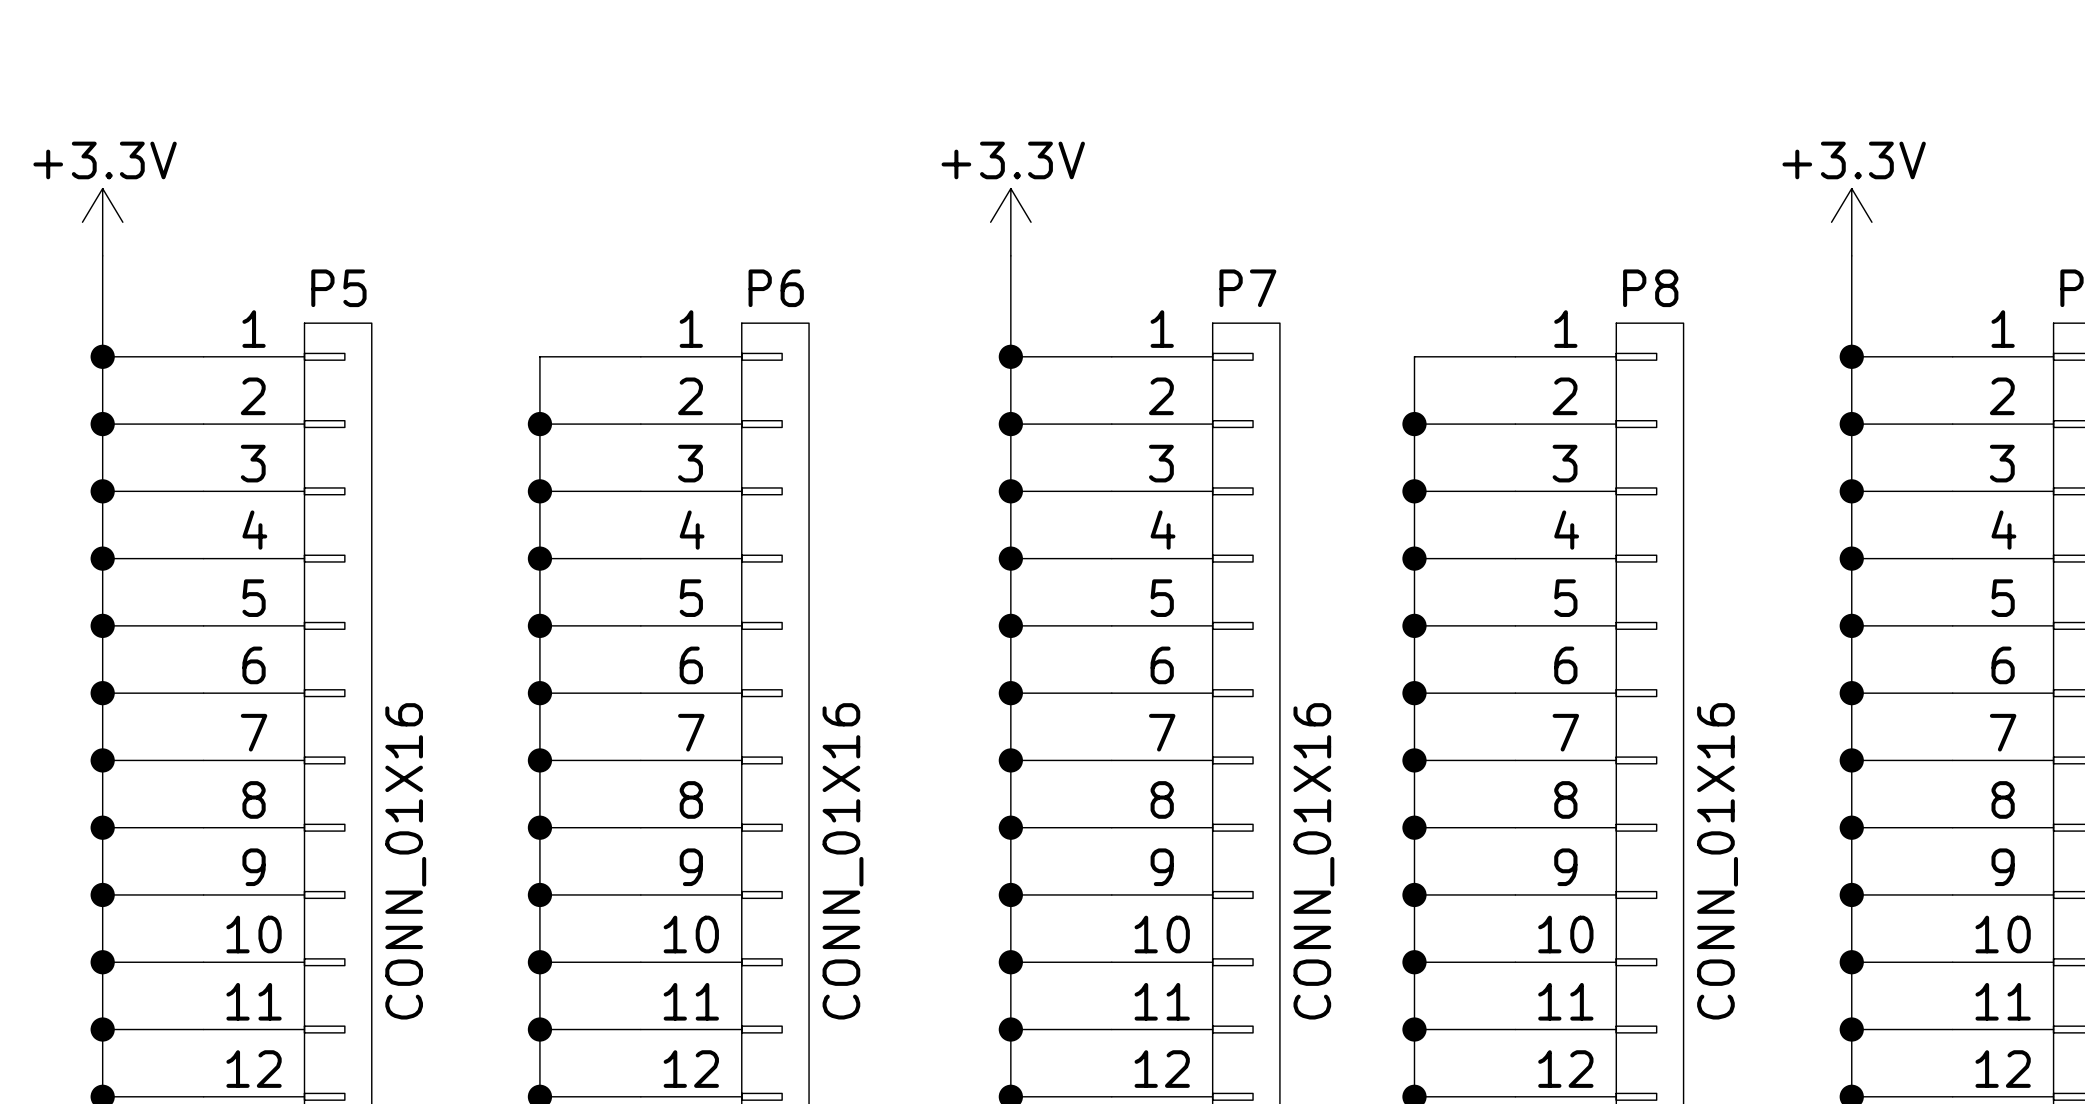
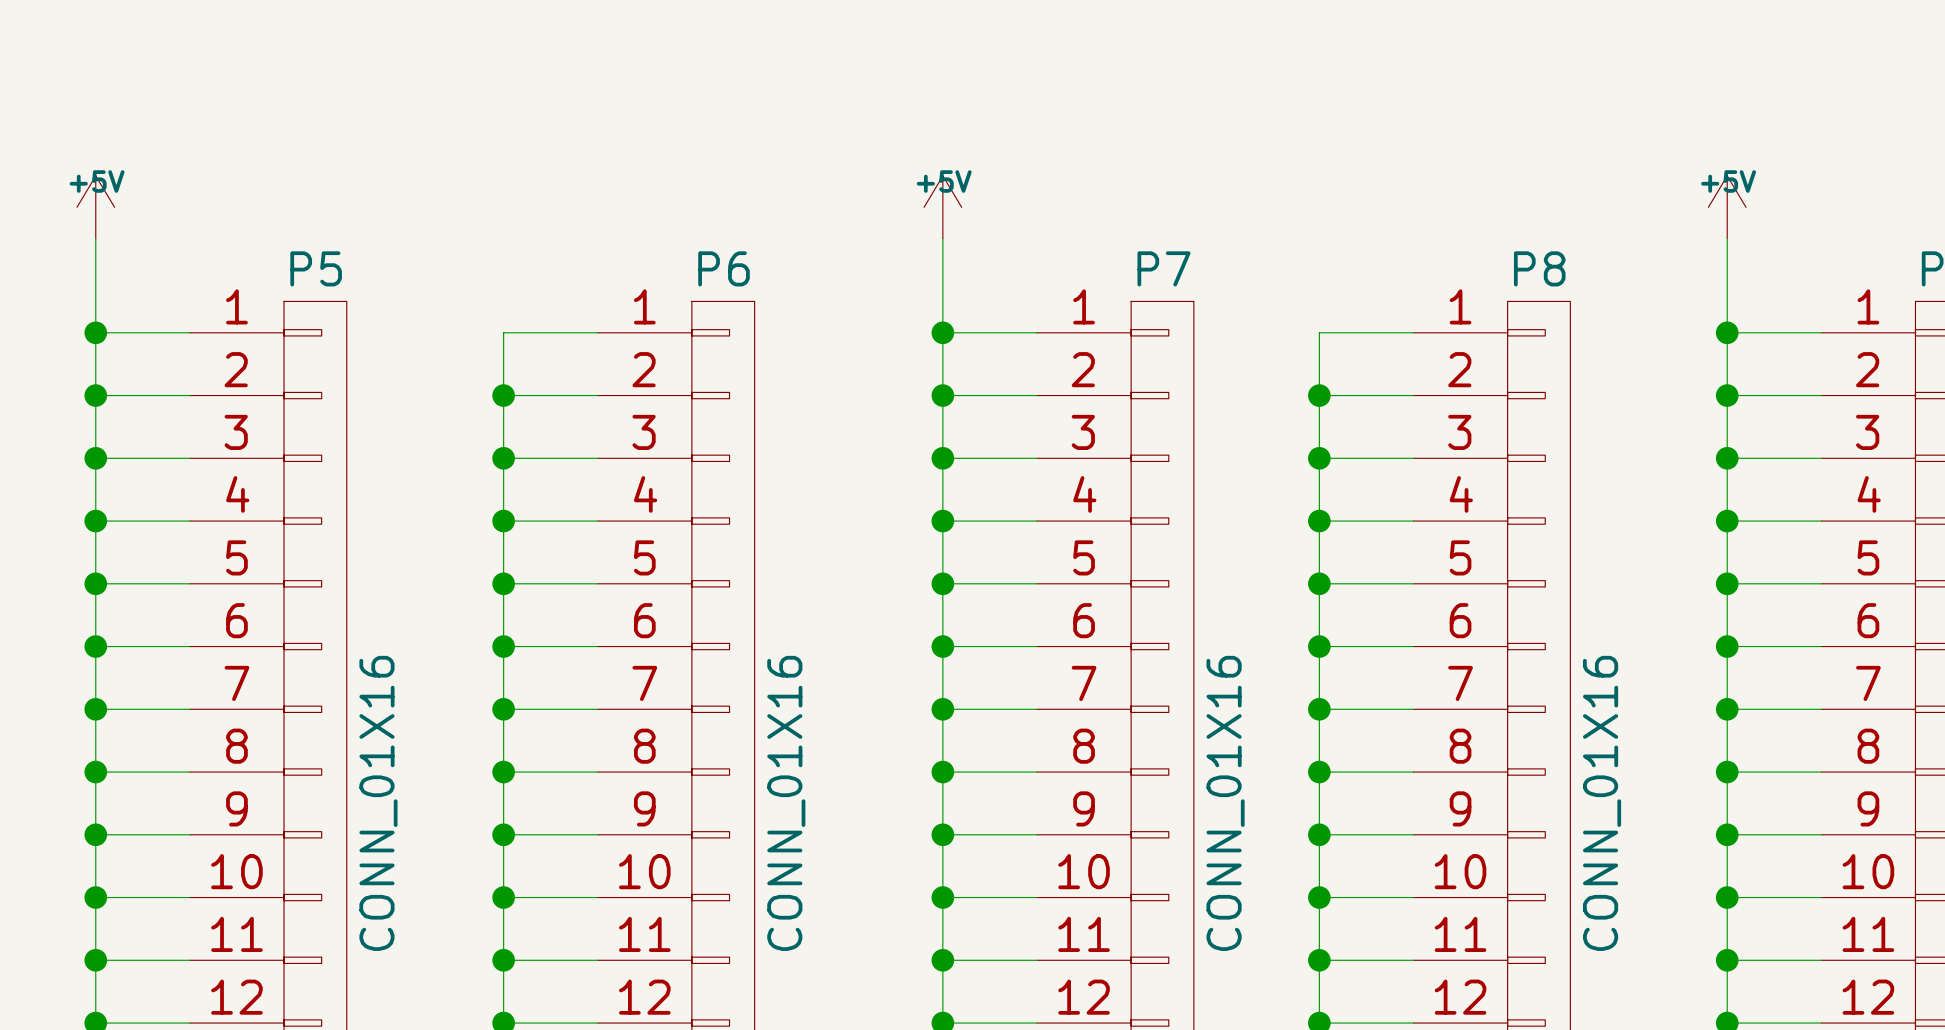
power symbol: +3.3V (102, 222) -> +5V (95, 207)
power symbol: +3.3V (1010, 222) -> +5V (942, 207)
power symbol: +3.3V (1851, 222) -> +5V (1727, 207)

